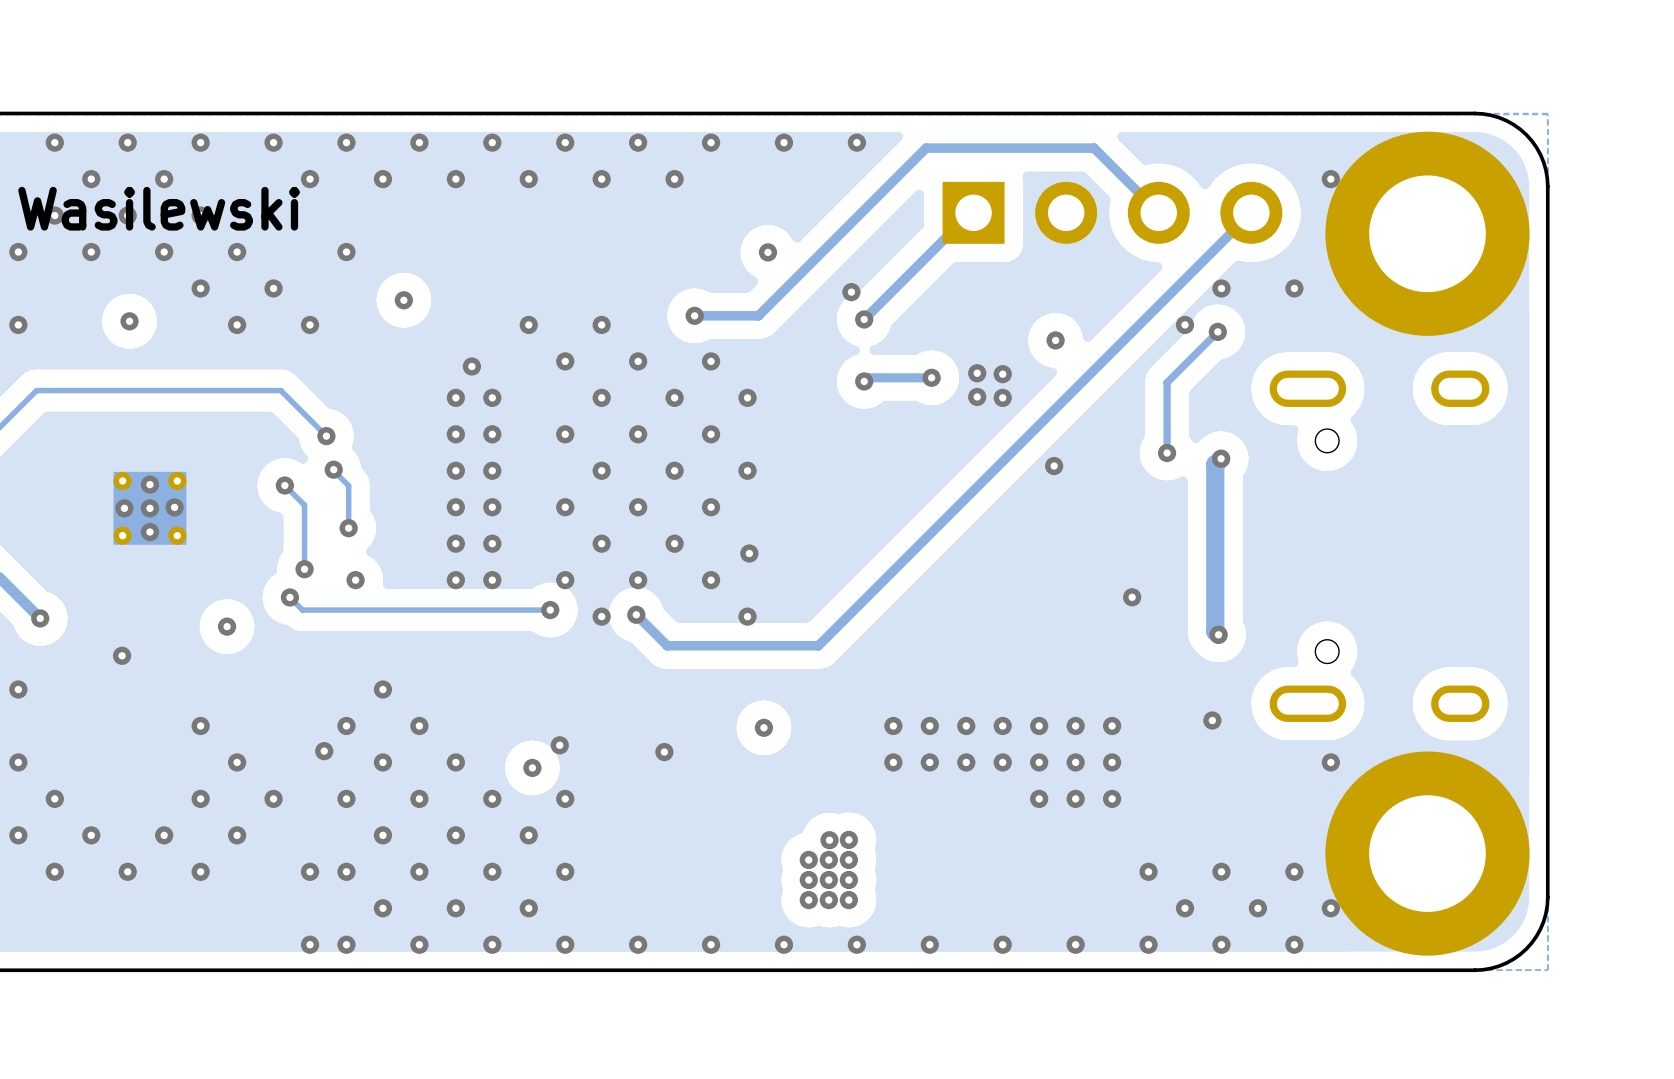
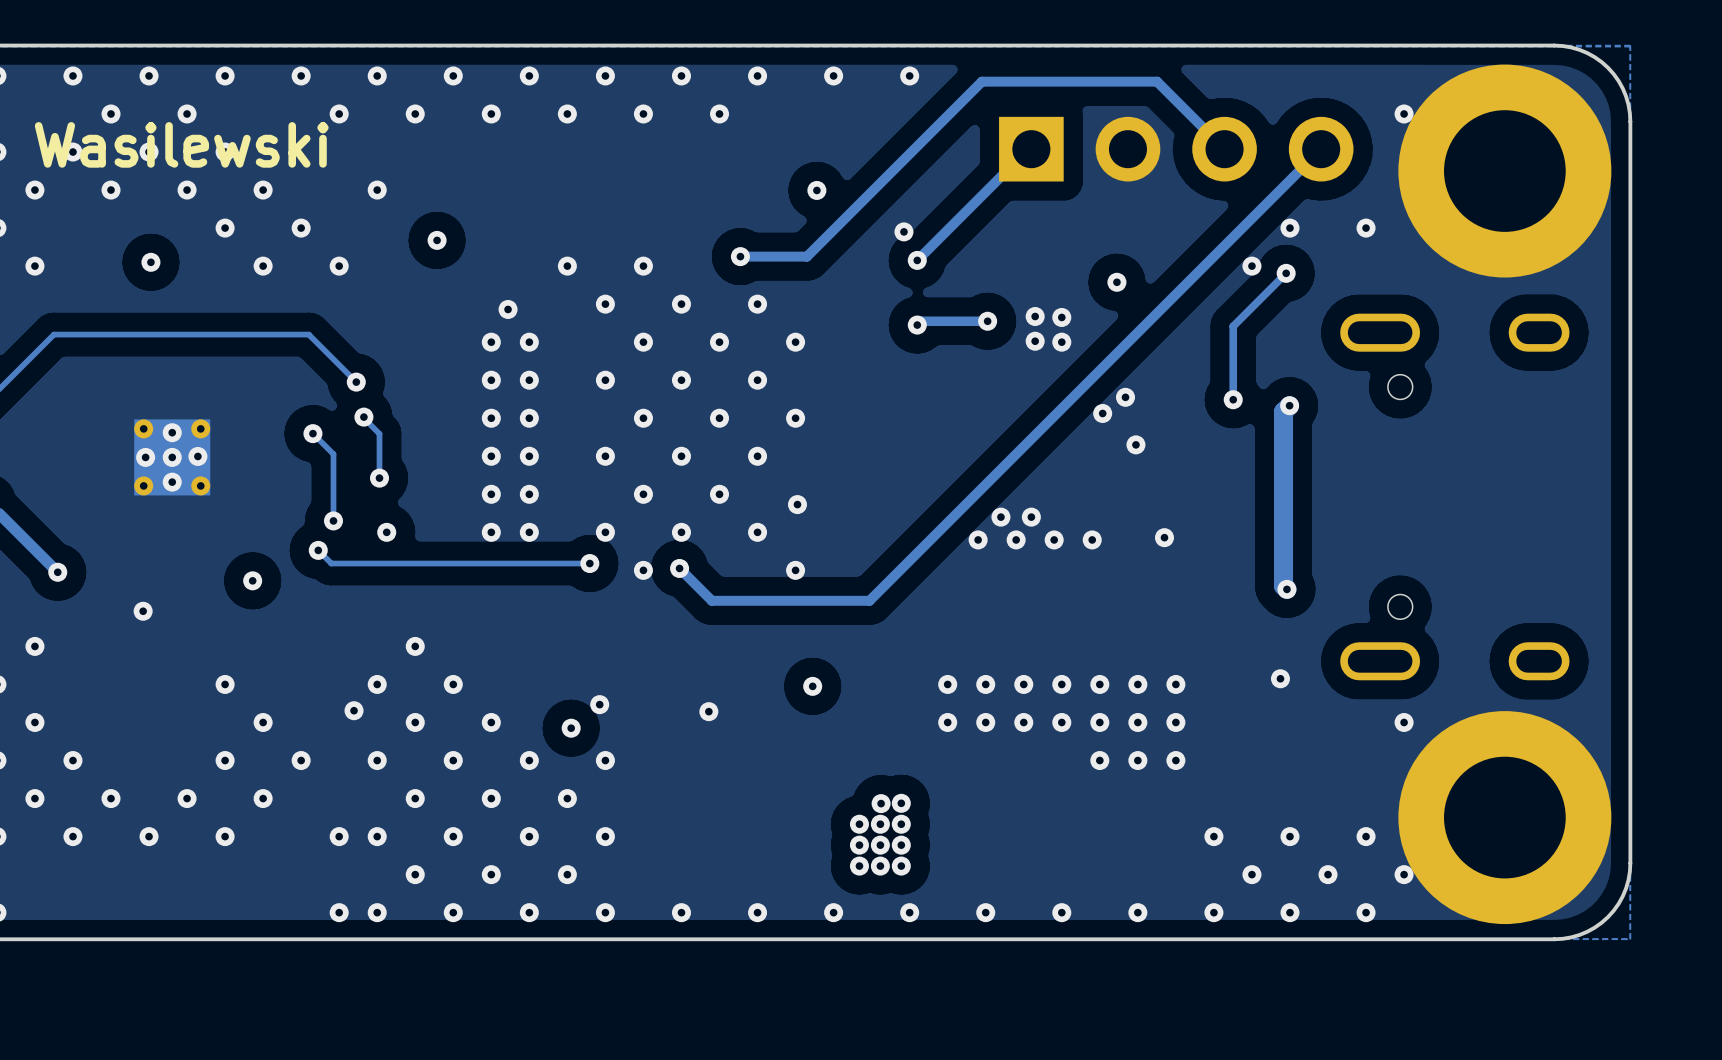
via: none -> (1125, 397)
via: none -> (1102, 413)
via: (1054, 466) -> none
via: none -> (1135, 444)
via: none -> (1000, 517)
via: none -> (1031, 517)
via: none -> (978, 539)
via: none -> (1016, 539)
via: none -> (1054, 539)
via: none -> (1092, 539)
via position: (1132, 597) -> (1164, 537)

